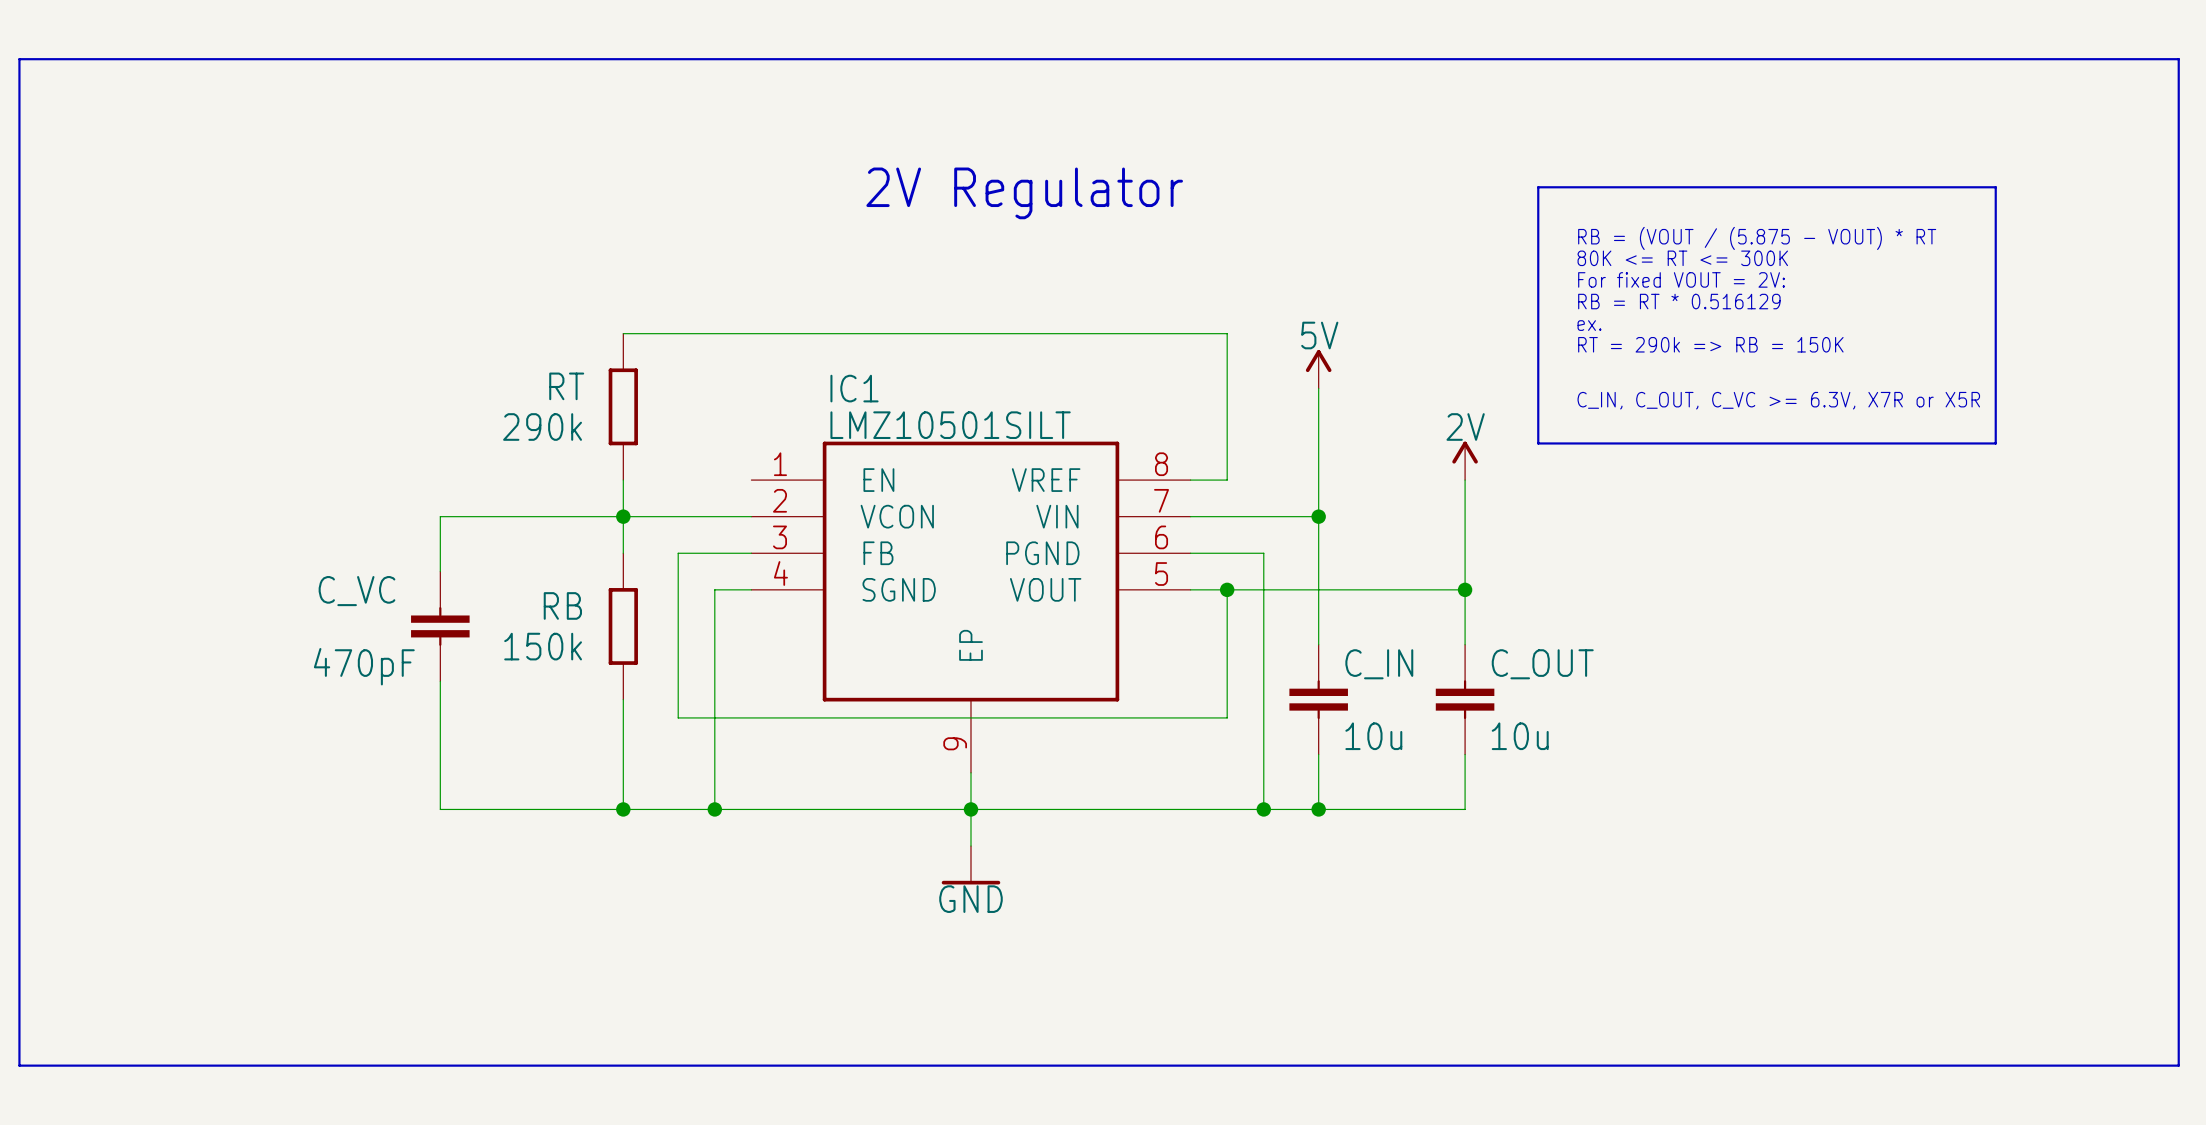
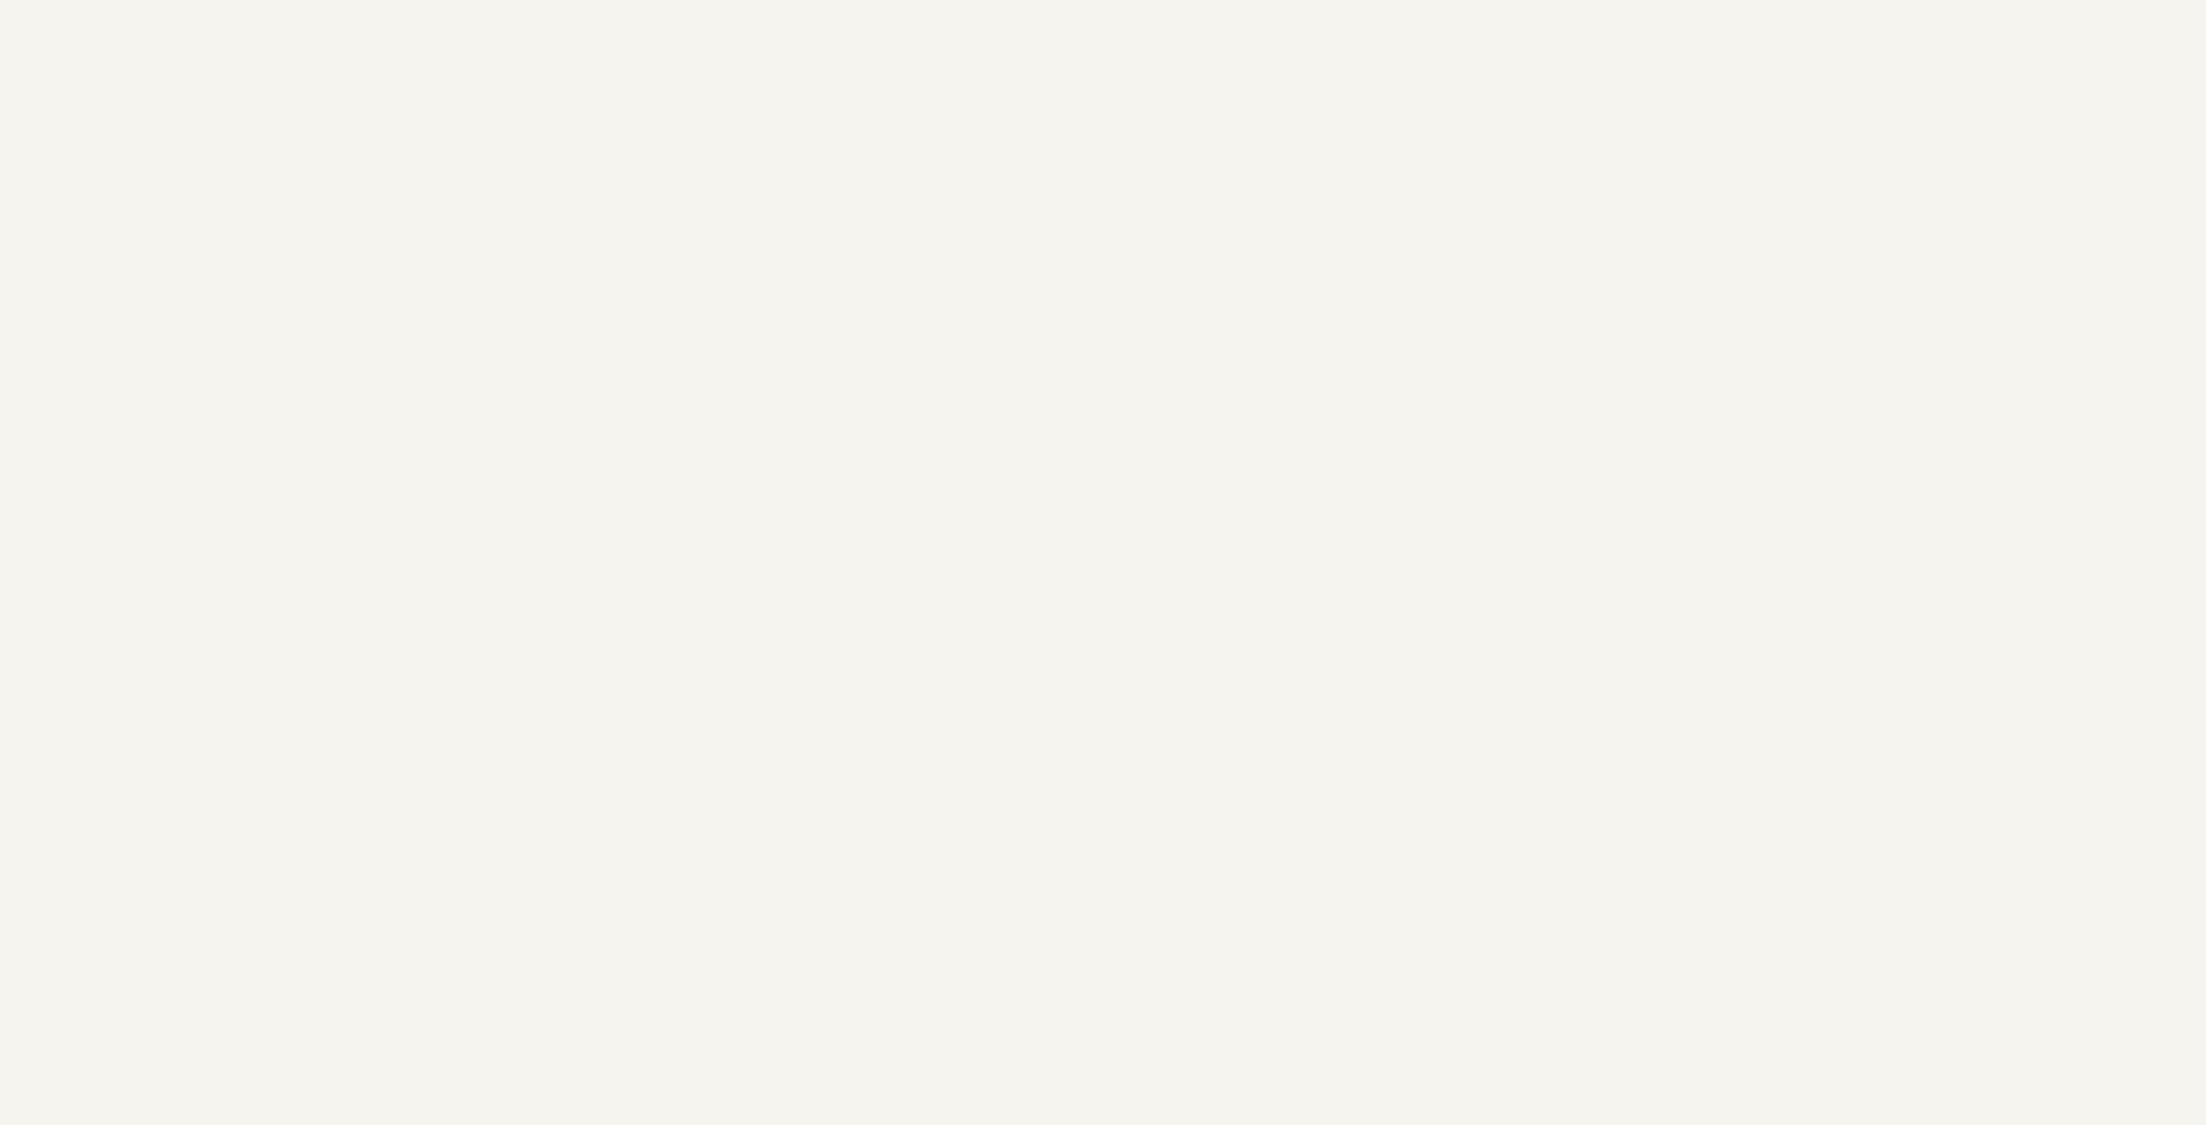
line: (19, 59) (19, 1065) (2178, 1065) (2178, 59) (19, 59) -> none
line: (1538, 187) (1995, 187) (1995, 443) (1538, 443) (1538, 187) -> none
text: 2V Regulator (1024, 193) -> none
text: RB = (VOUT / (5.875 - VOUT) * RT (1757, 238) -> none
text: 80K <= RT <= 300K (1682, 258) -> none
text: For fixed VOUT = 2V: (1681, 279) -> none
text: RB = RT * 0.516129 (1679, 301) -> none
text: ex. (1589, 325) -> none
wire: (623, 333) (1227, 333) (1227, 480) (1190, 480) -> none
text: RT = 290k => RB = 150K (1710, 344) -> none
power symbol: 5V (1318, 369) -> none
wire: (1318, 388) (1318, 644) -> none
text: C_IN, C_OUT, C_VC >= 6.3V, X7R or X5R (1778, 400) -> none
RT: 290k (623, 406) -> none
power symbol: 2V (1465, 460) -> none
wire: (623, 480) (623, 553) -> none
wire: (1465, 480) (1465, 644) -> none
junction: (623, 516) -> none
wire: (751, 516) (440, 516) (440, 571) -> none
wire: (1190, 516) (1318, 516) -> none
junction: (1318, 516) -> none
wire: (751, 553) (678, 553) (678, 717) (1227, 717) (1227, 589) -> none
wire: (1190, 553) (1263, 553) (1263, 809) -> none
wire: (751, 589) (714, 589) (714, 809) -> none
wire: (1190, 589) (1465, 589) -> none
junction: (1227, 589) -> none
junction: (1465, 589) -> none
IC1: LMZ10501SILT (970, 607) -> none
C_VC: 470pF (440, 626) -> none
RB: 150k (623, 626) -> none
wire: (440, 681) (440, 809) (1465, 809) (1465, 754) -> none
wire: (623, 699) (623, 809) -> none
C_IN: 10u (1318, 699) -> none
C_OUT: 10u (1465, 699) -> none
wire: (1318, 754) (1318, 809) -> none
wire: (970, 772) (970, 846) -> none
junction: (623, 809) -> none
junction: (714, 809) -> none
junction: (970, 809) -> none
junction: (1263, 809) -> none
junction: (1318, 809) -> none
power symbol: GND (970, 865) -> none

